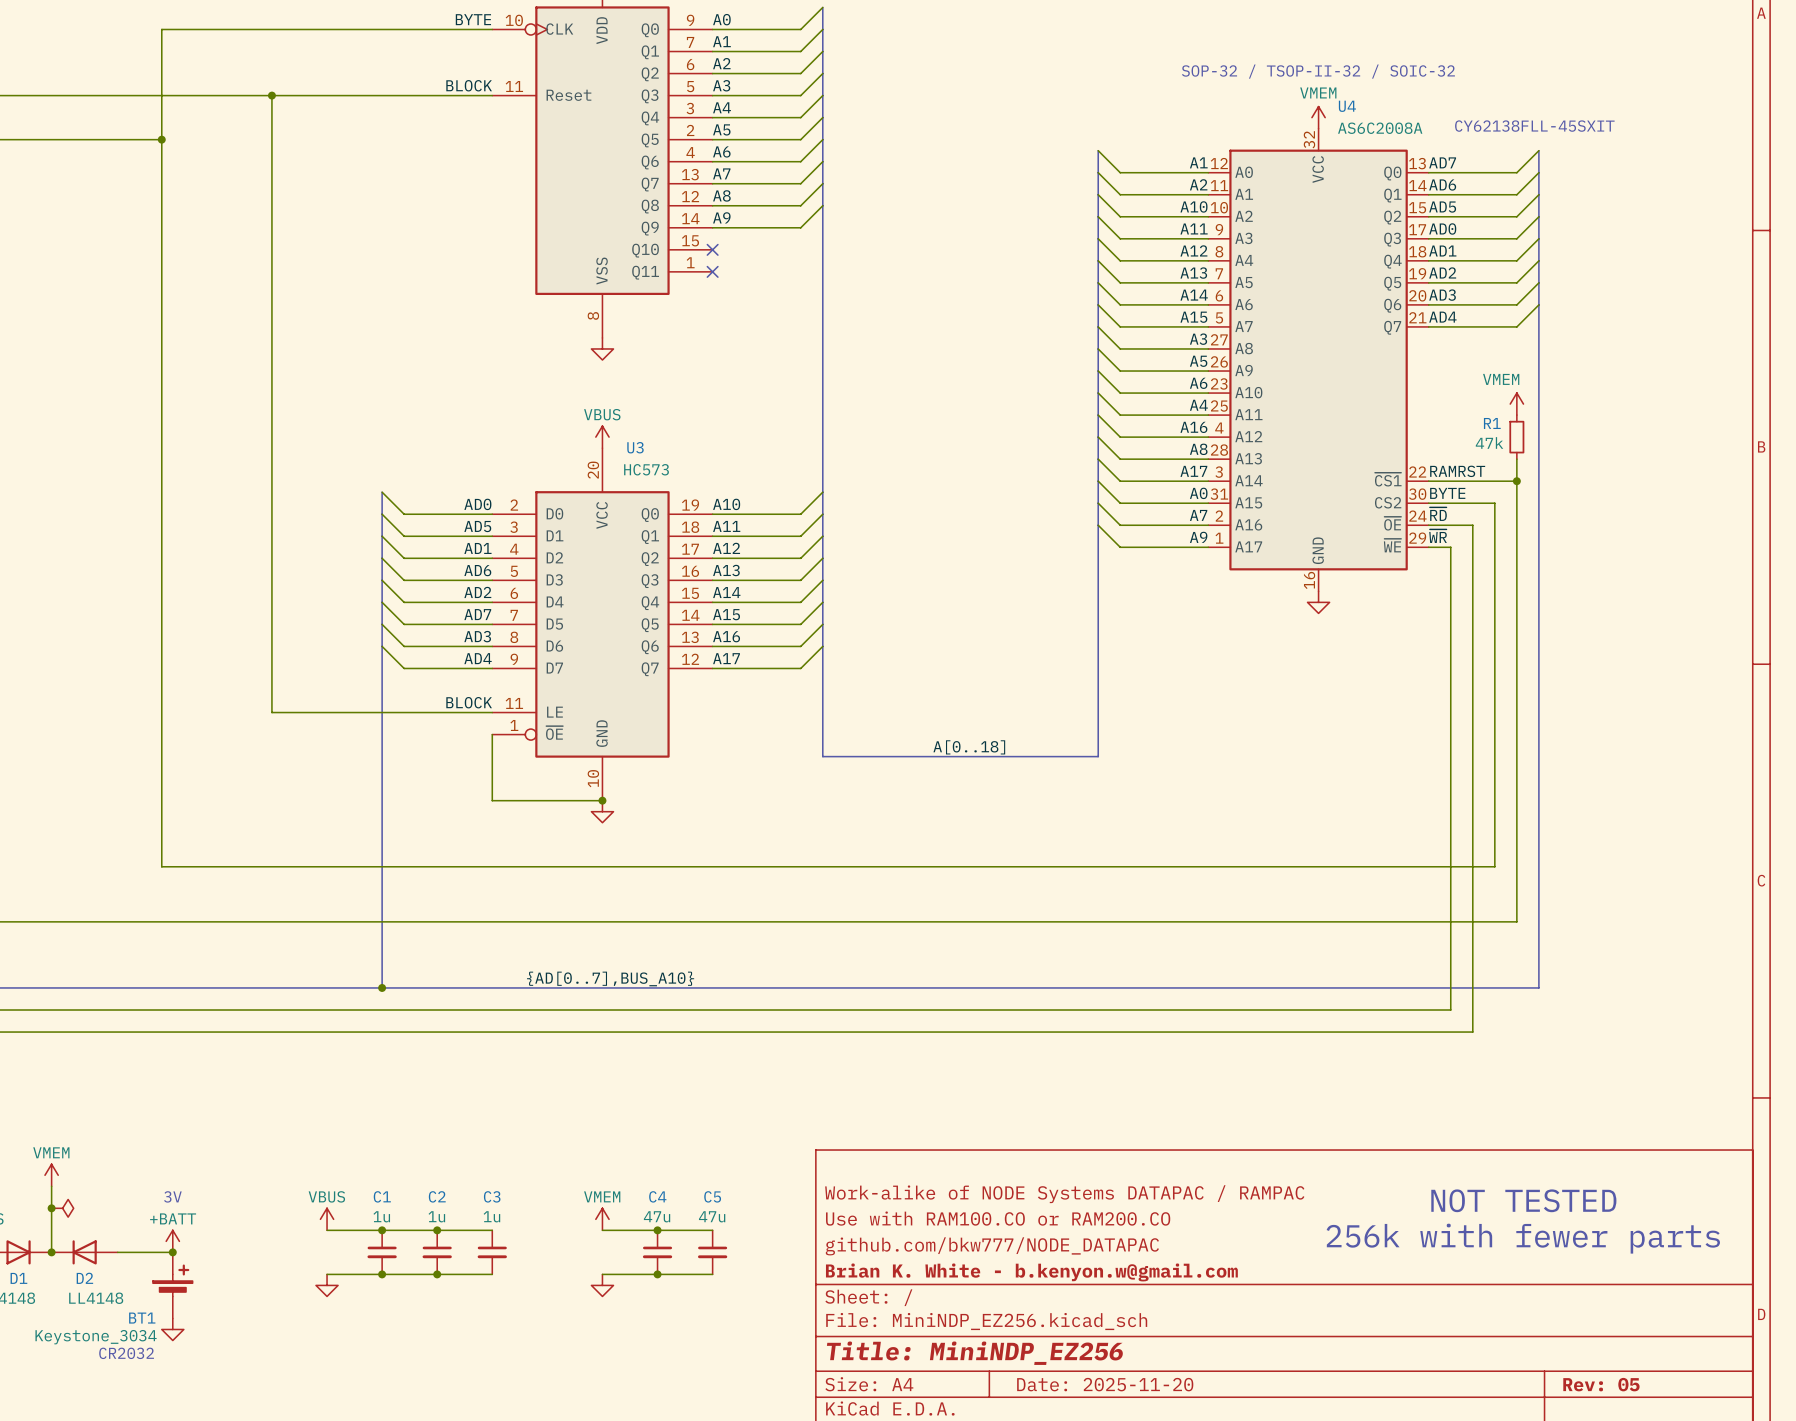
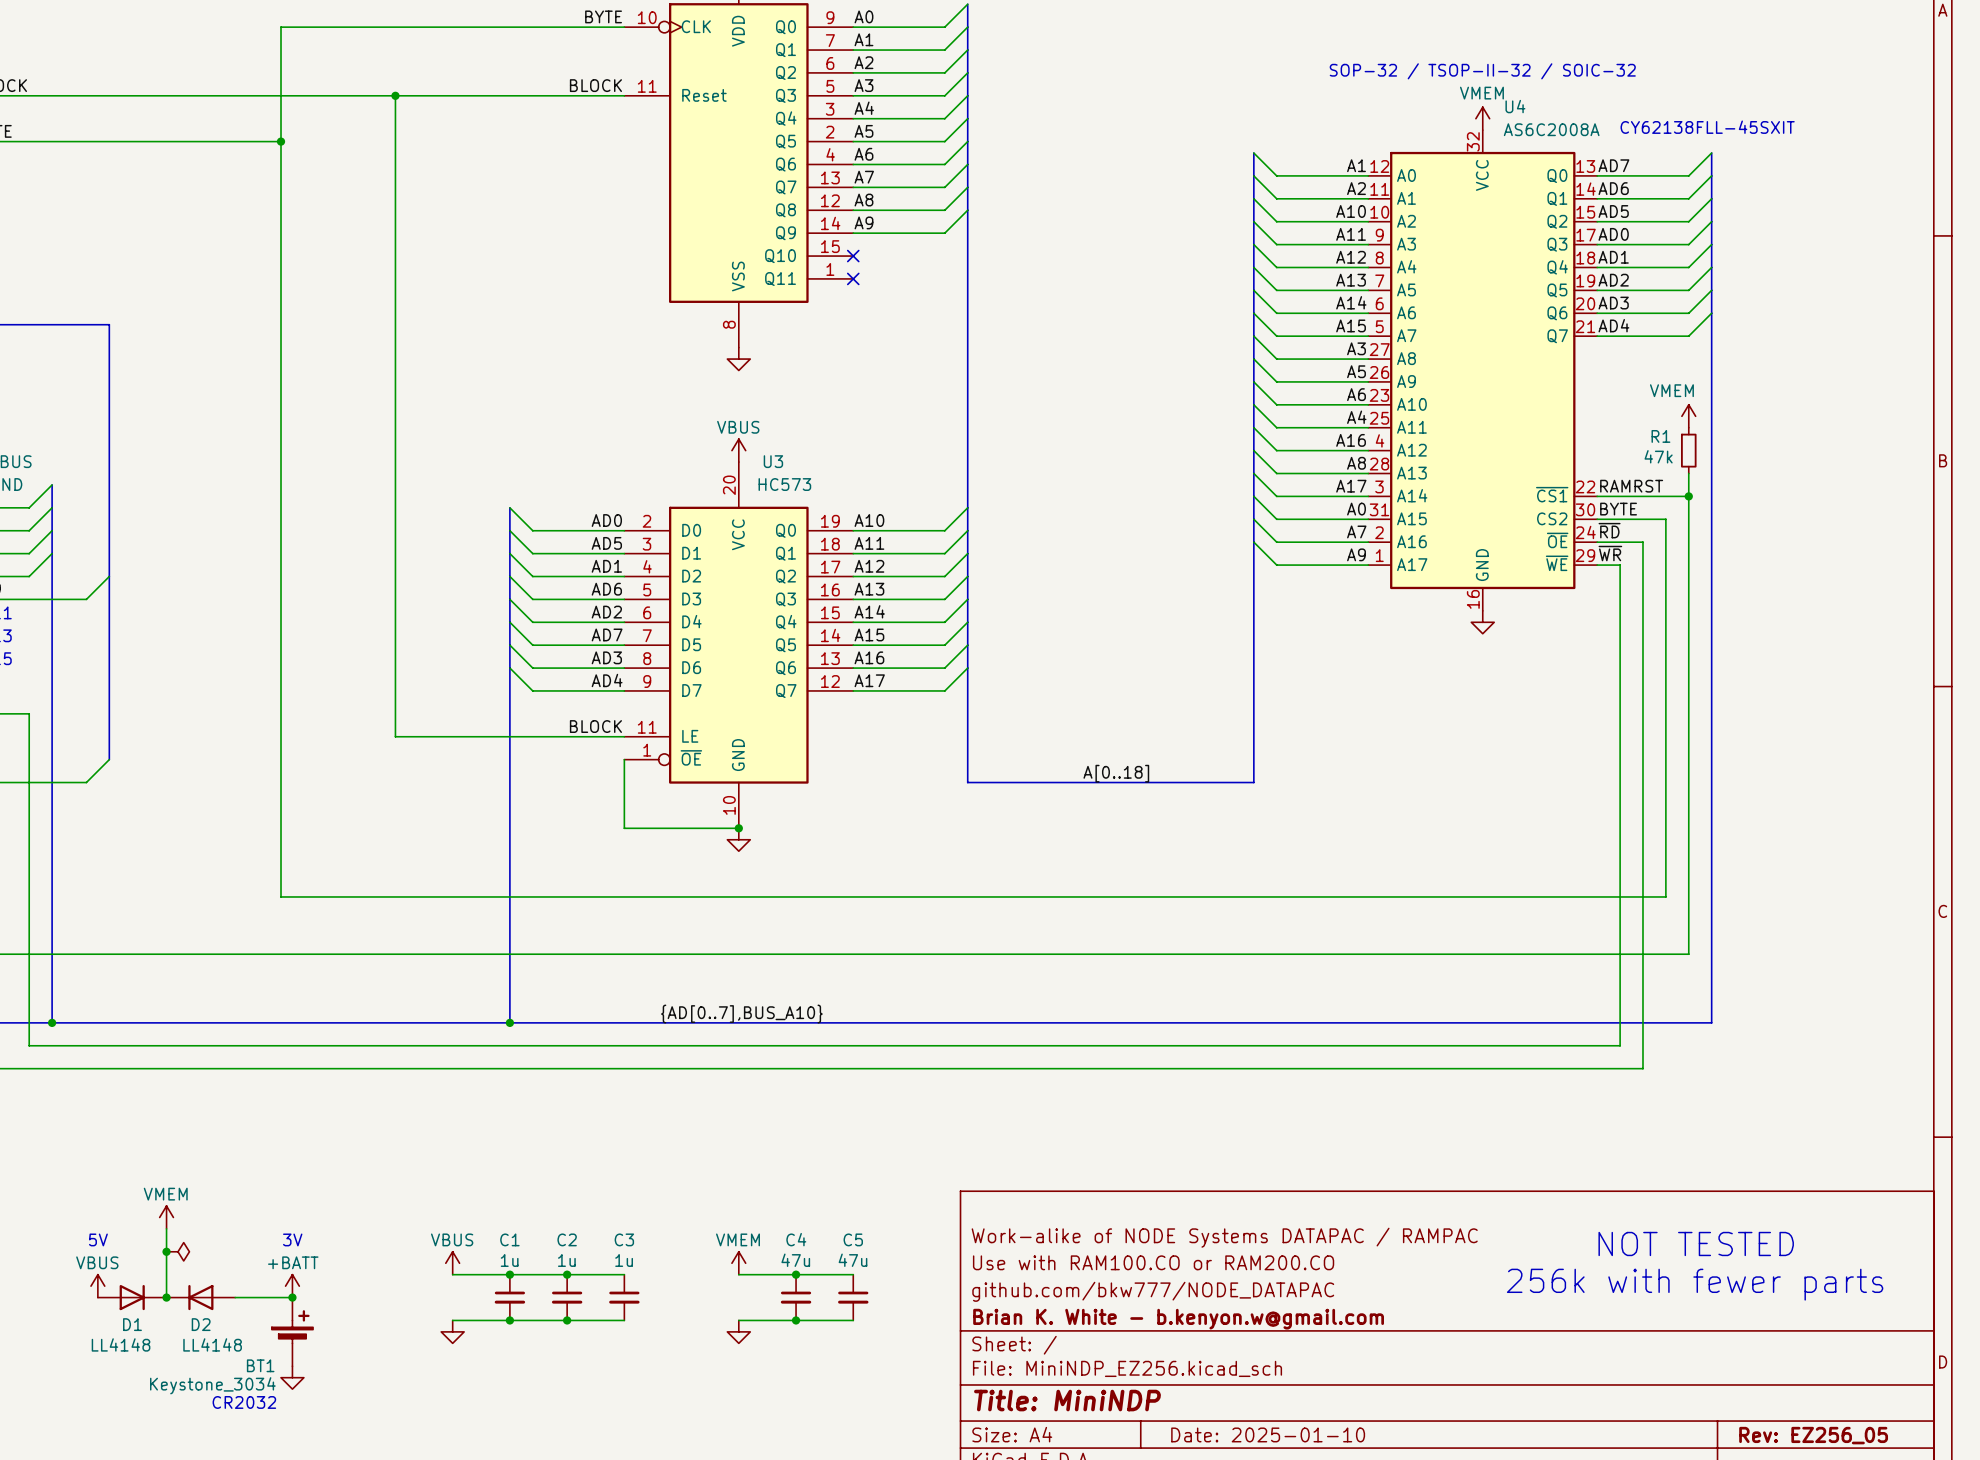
title block: Title: MiniNDP_EZ256 (974, 1353) -> Title: MiniNDP (1067, 1400)
title block: Date: 2025-11-20 (1105, 1384) -> Date: 2025-01-10 (1268, 1434)
title block: Rev: 05 (1601, 1384) -> Rev: EZ256_05 (1813, 1435)

